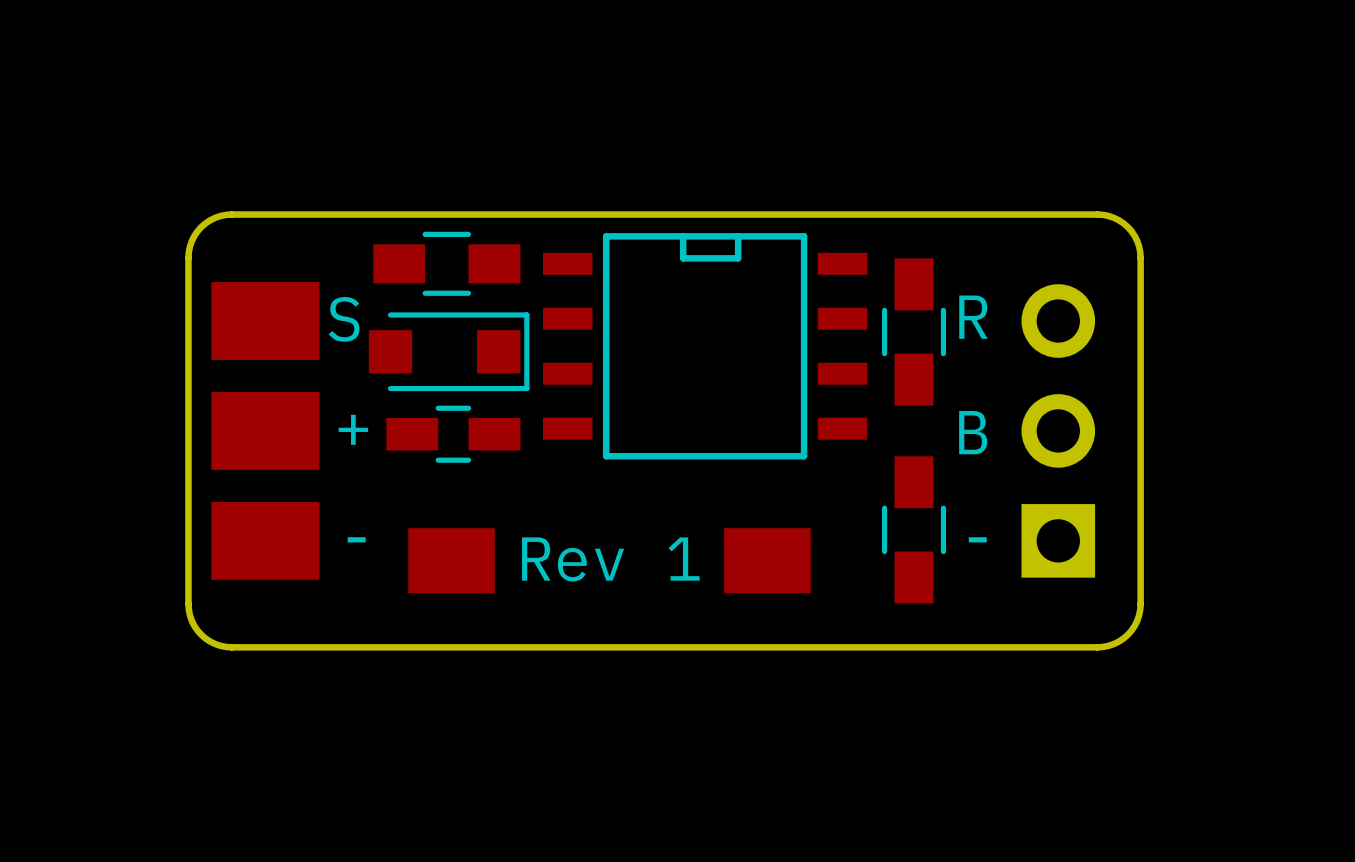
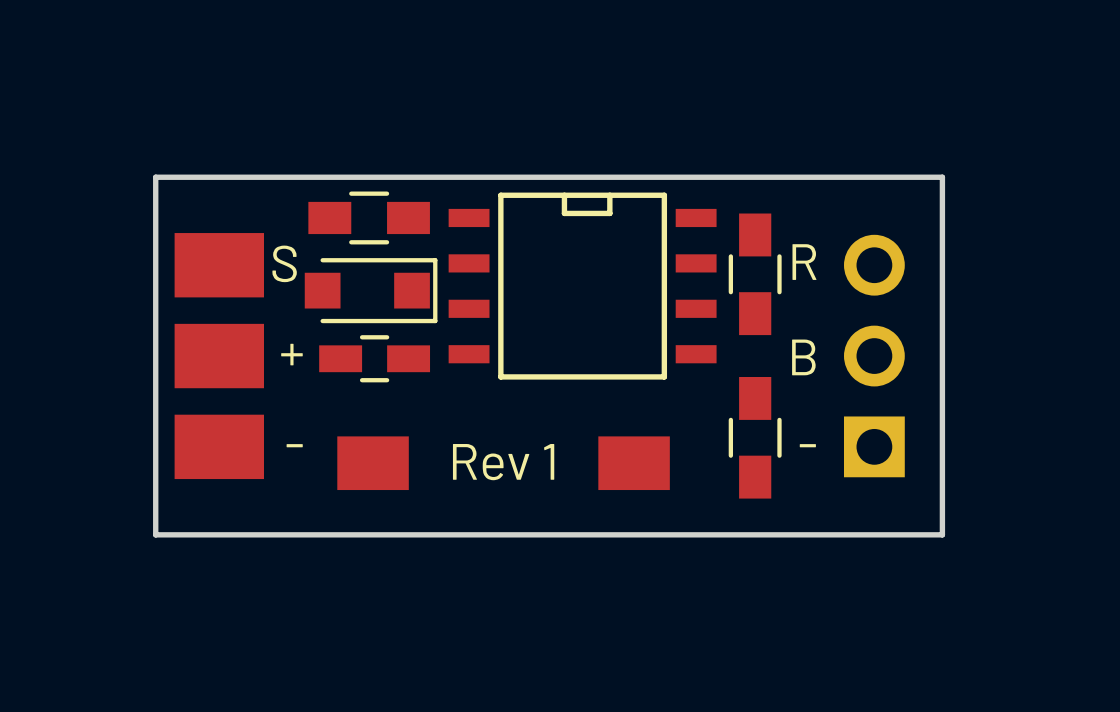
board edge: (231, 214) (215, 217) (201, 227) (191, 241) (188, 257) -> (191, 177) (155, 177) (155, 213)
board edge: (1097, 214) (1113, 217) (1127, 227) (1137, 241) (1140, 257) -> (906, 177) (942, 177) (942, 213)
board edge: (188, 604) (191, 620) (201, 634) (215, 644) (231, 647) -> (155, 499) (155, 534) (191, 534)
board edge: (1140, 604) (1137, 620) (1127, 634) (1113, 644) (1097, 647) -> (942, 499) (942, 534) (906, 534)

